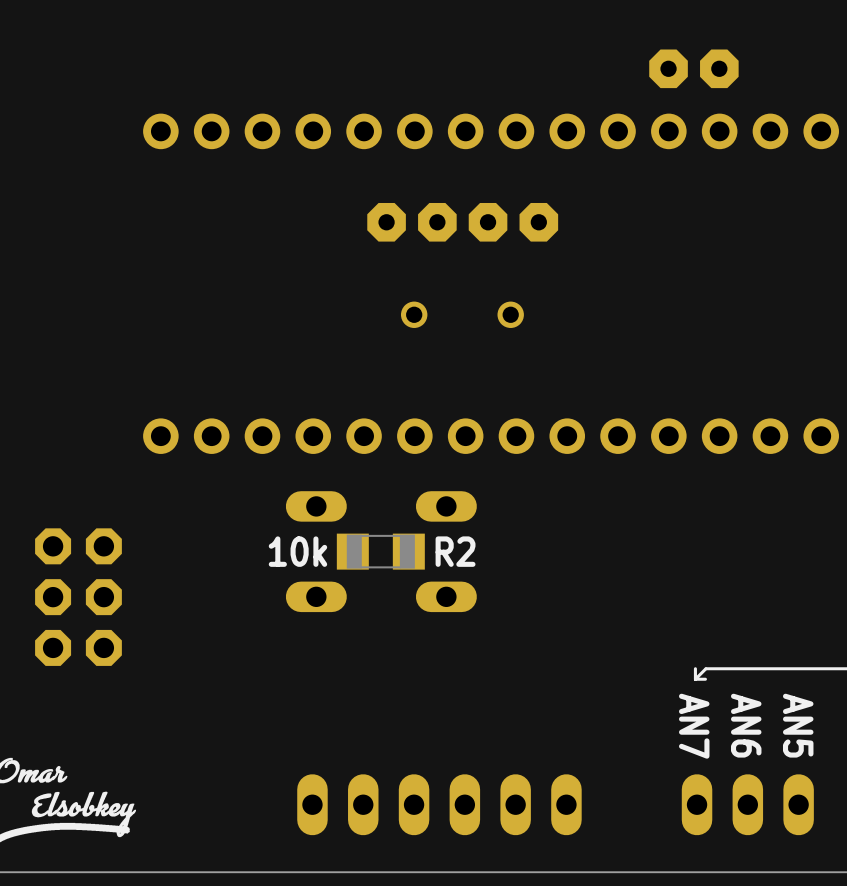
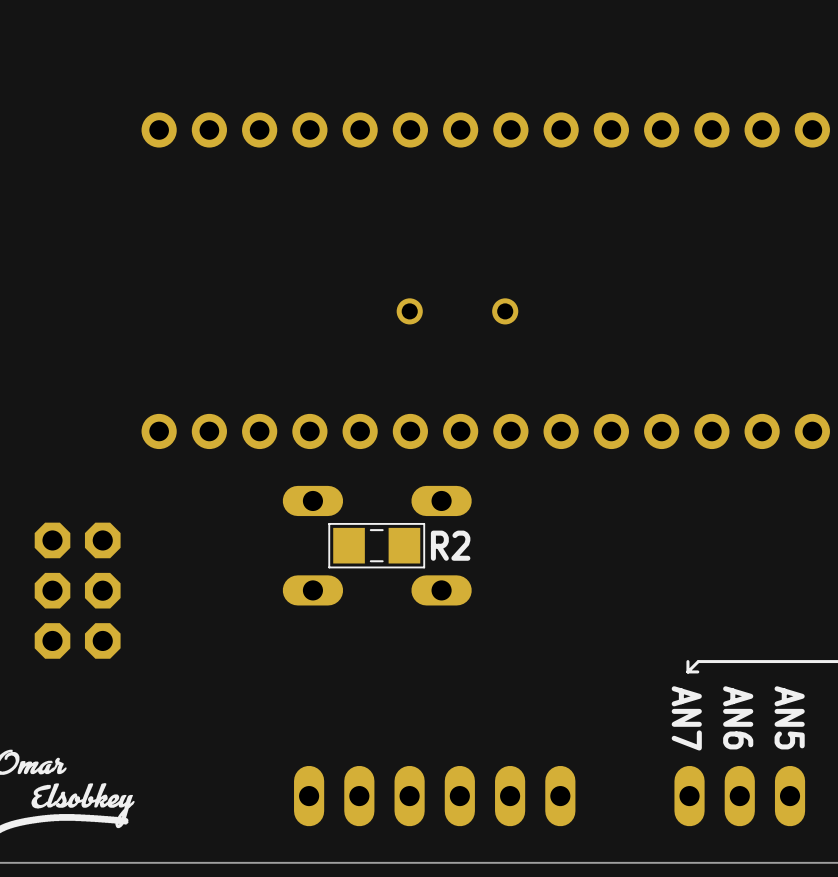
part: (693, 68) -> none
part: (411, 222) -> none
part: (513, 222) -> none
R2 footprint: [336, 533, 425, 570] -> [328, 523, 425, 568]
R2 value: 10k (297, 551) -> none

